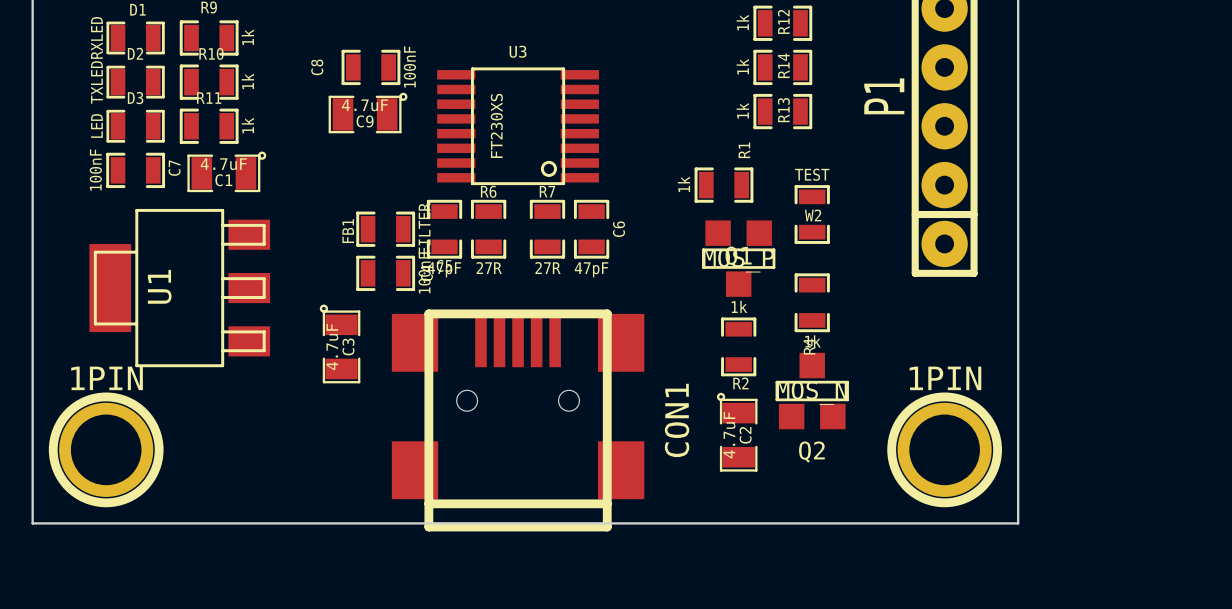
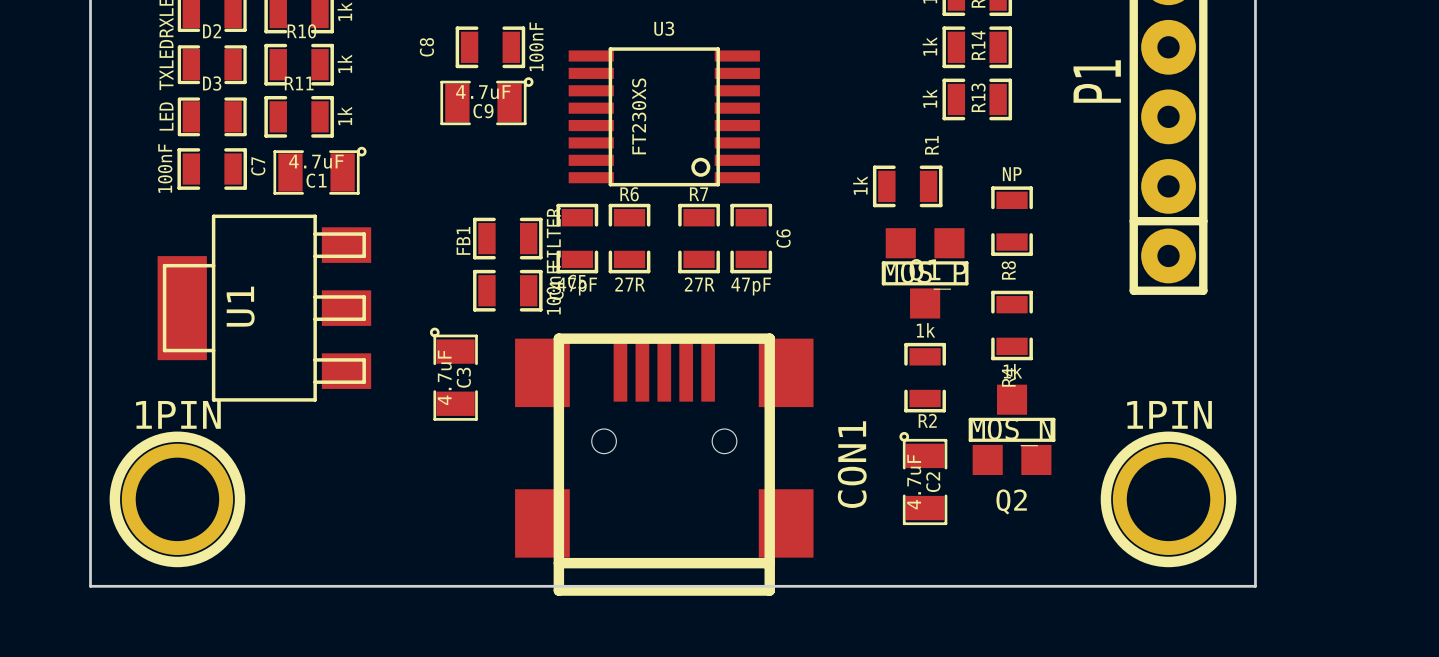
W2 value: TEST (812, 174) -> NP (1012, 174)
W2 name: W2 (813, 215) -> R8 (1008, 270)

